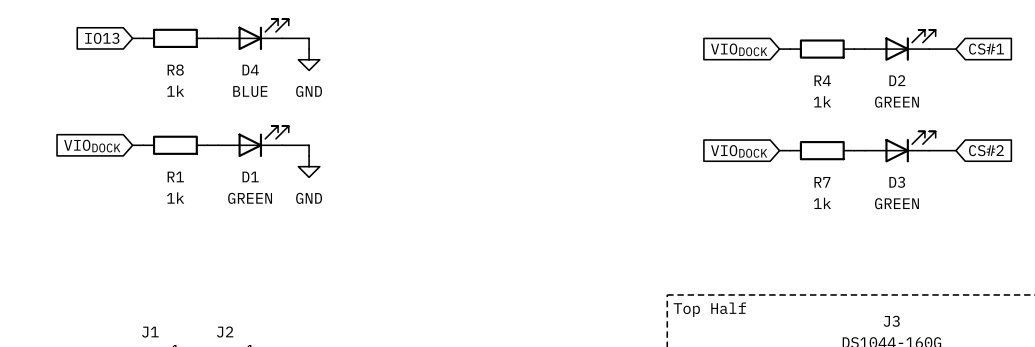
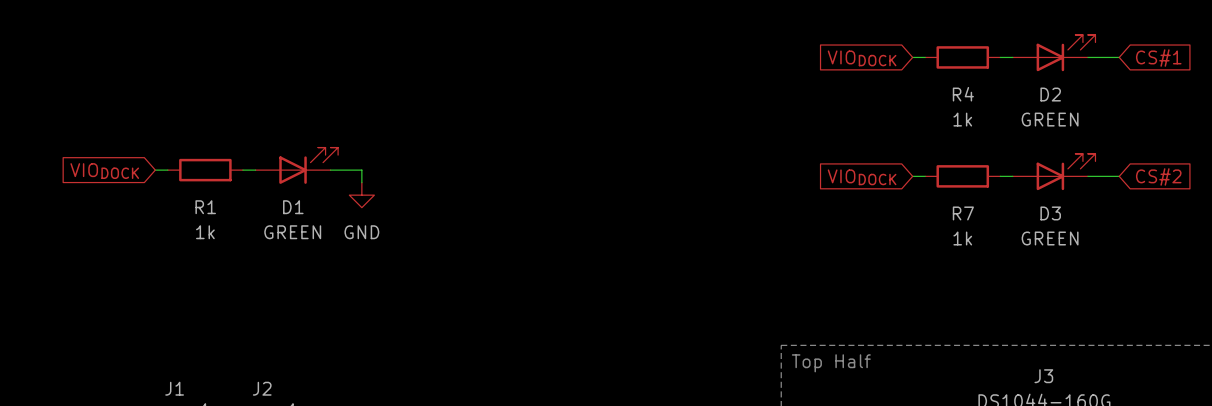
D4: BLUE (253, 34) -> none
global label: IO13 (102, 38) -> none
wire: (132, 38) (143, 38) -> none
R8: 1k (175, 38) -> none
wire: (207, 38) (218, 38) -> none
wire: (282, 38) (309, 38) (309, 49) -> none
power symbol: GND (309, 59) -> none

